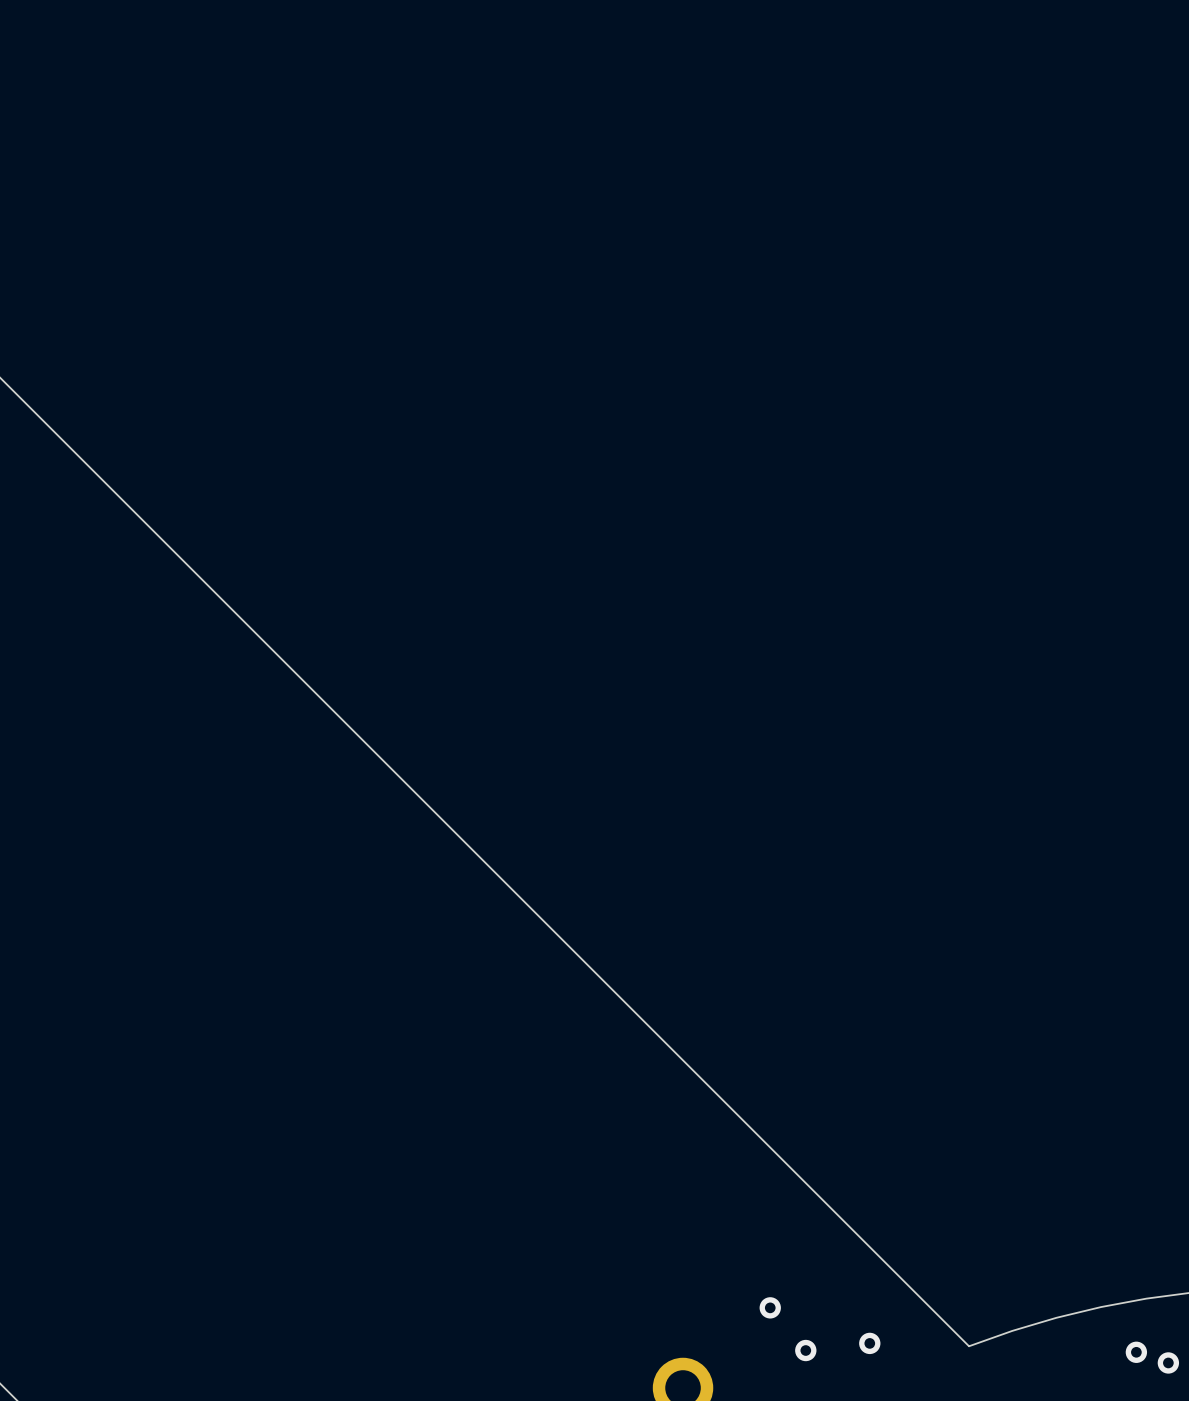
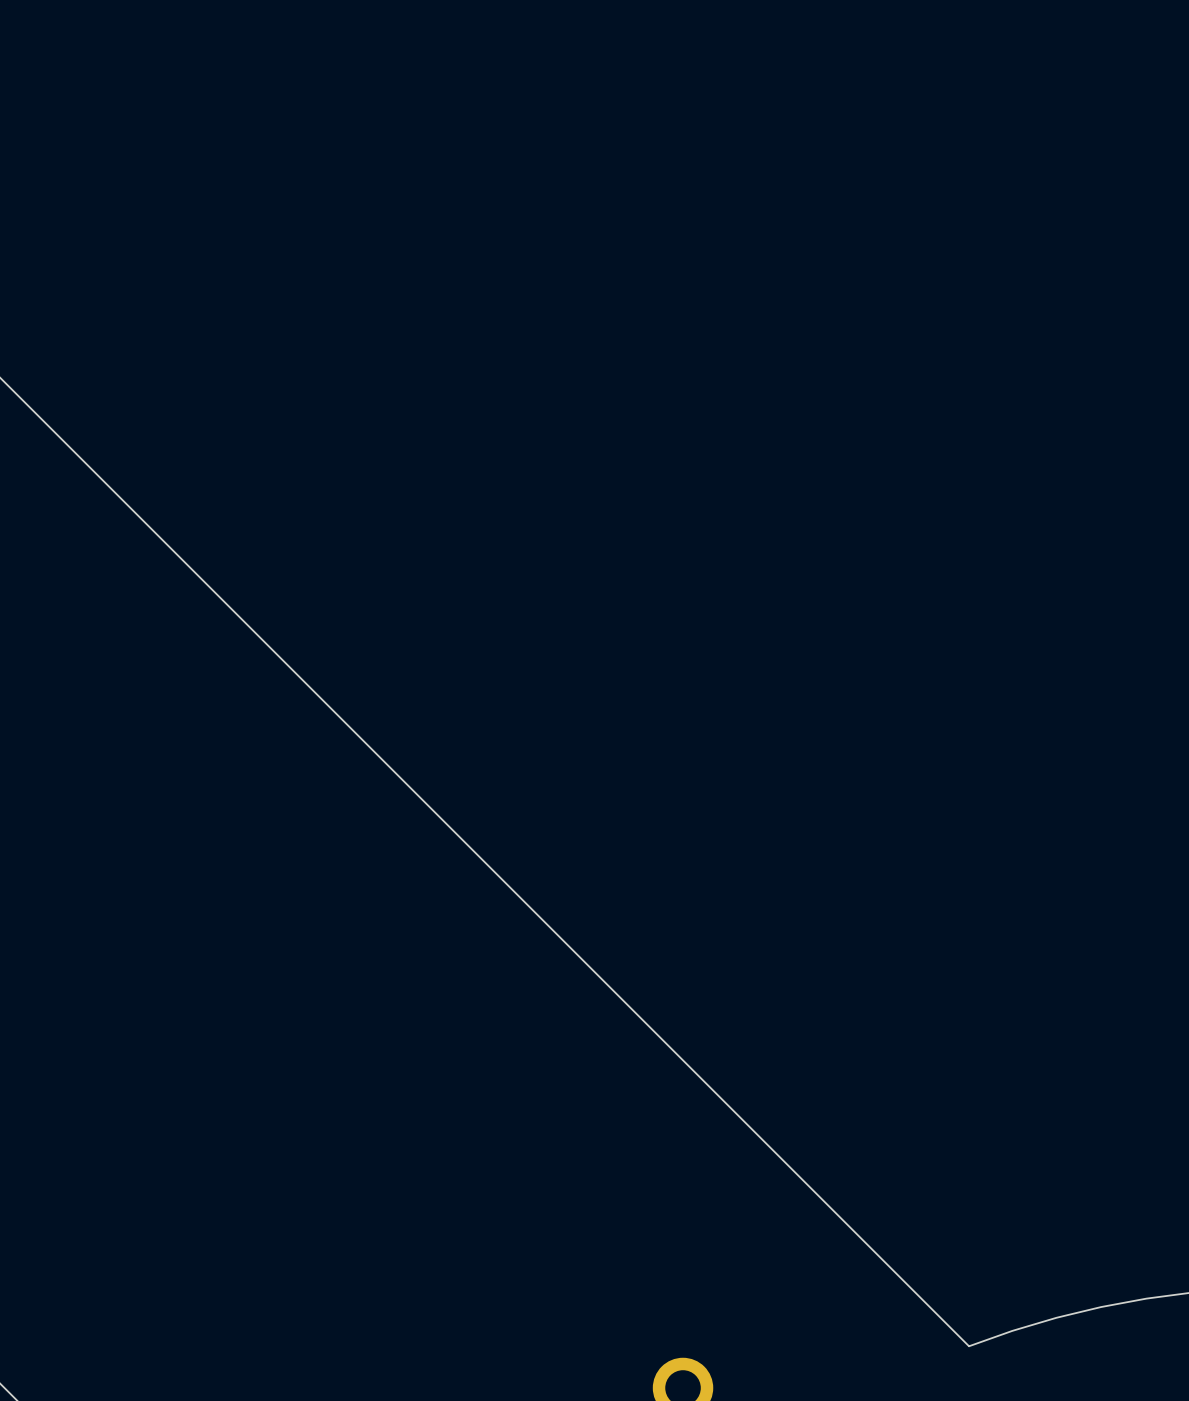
via: (770, 1307) -> none
via: (869, 1343) -> none
via: (805, 1350) -> none
via: (1136, 1352) -> none
via: (1168, 1362) -> none

